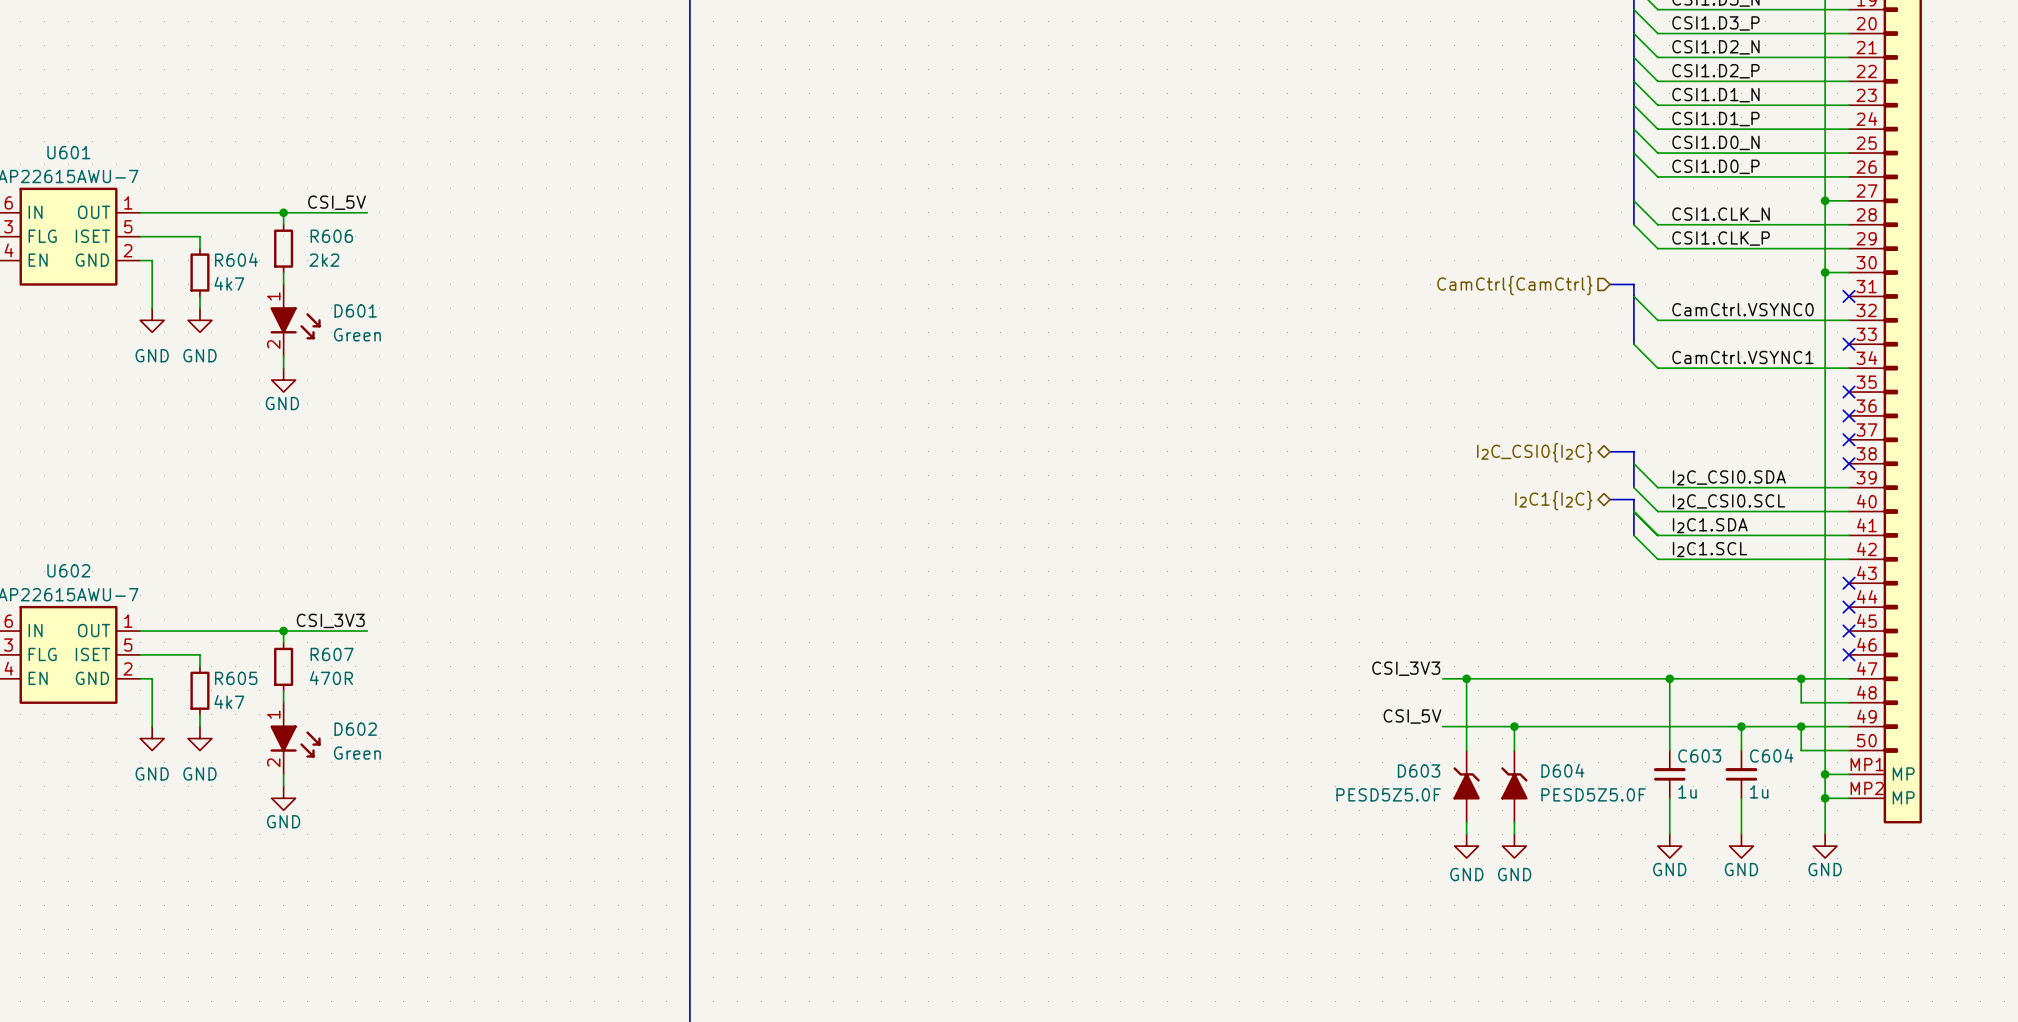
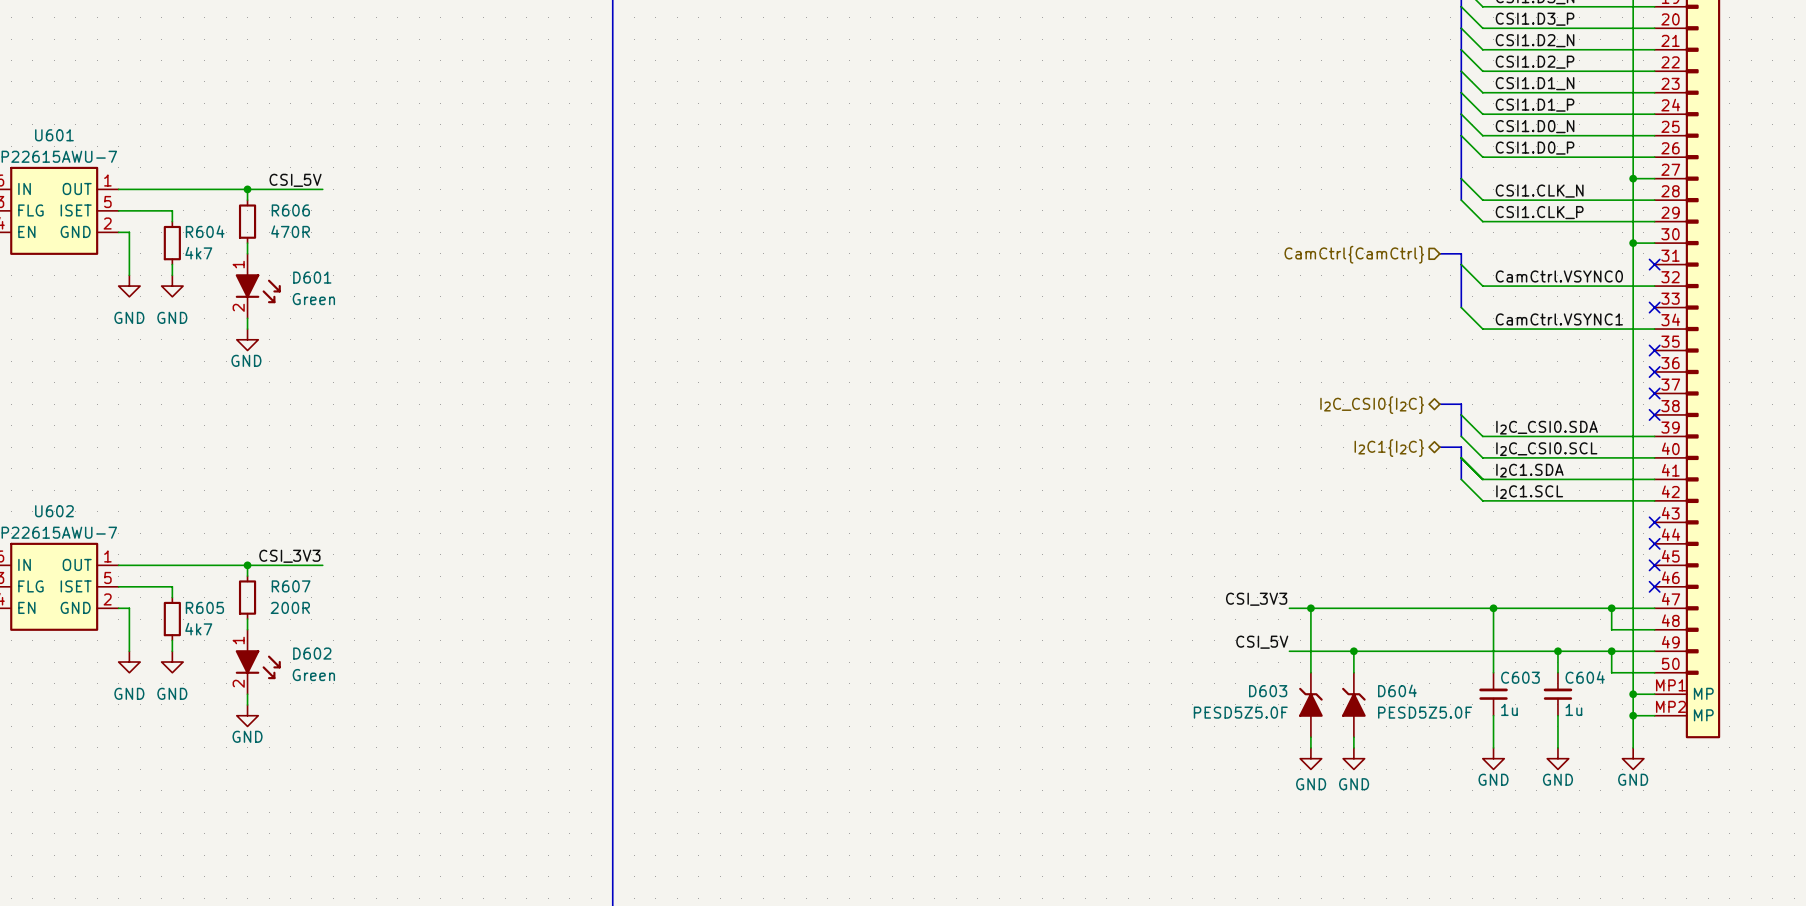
R606 text: 2k2 (324, 260) -> 470R (290, 231)
R607 text: 470R (331, 678) -> 200R (290, 607)

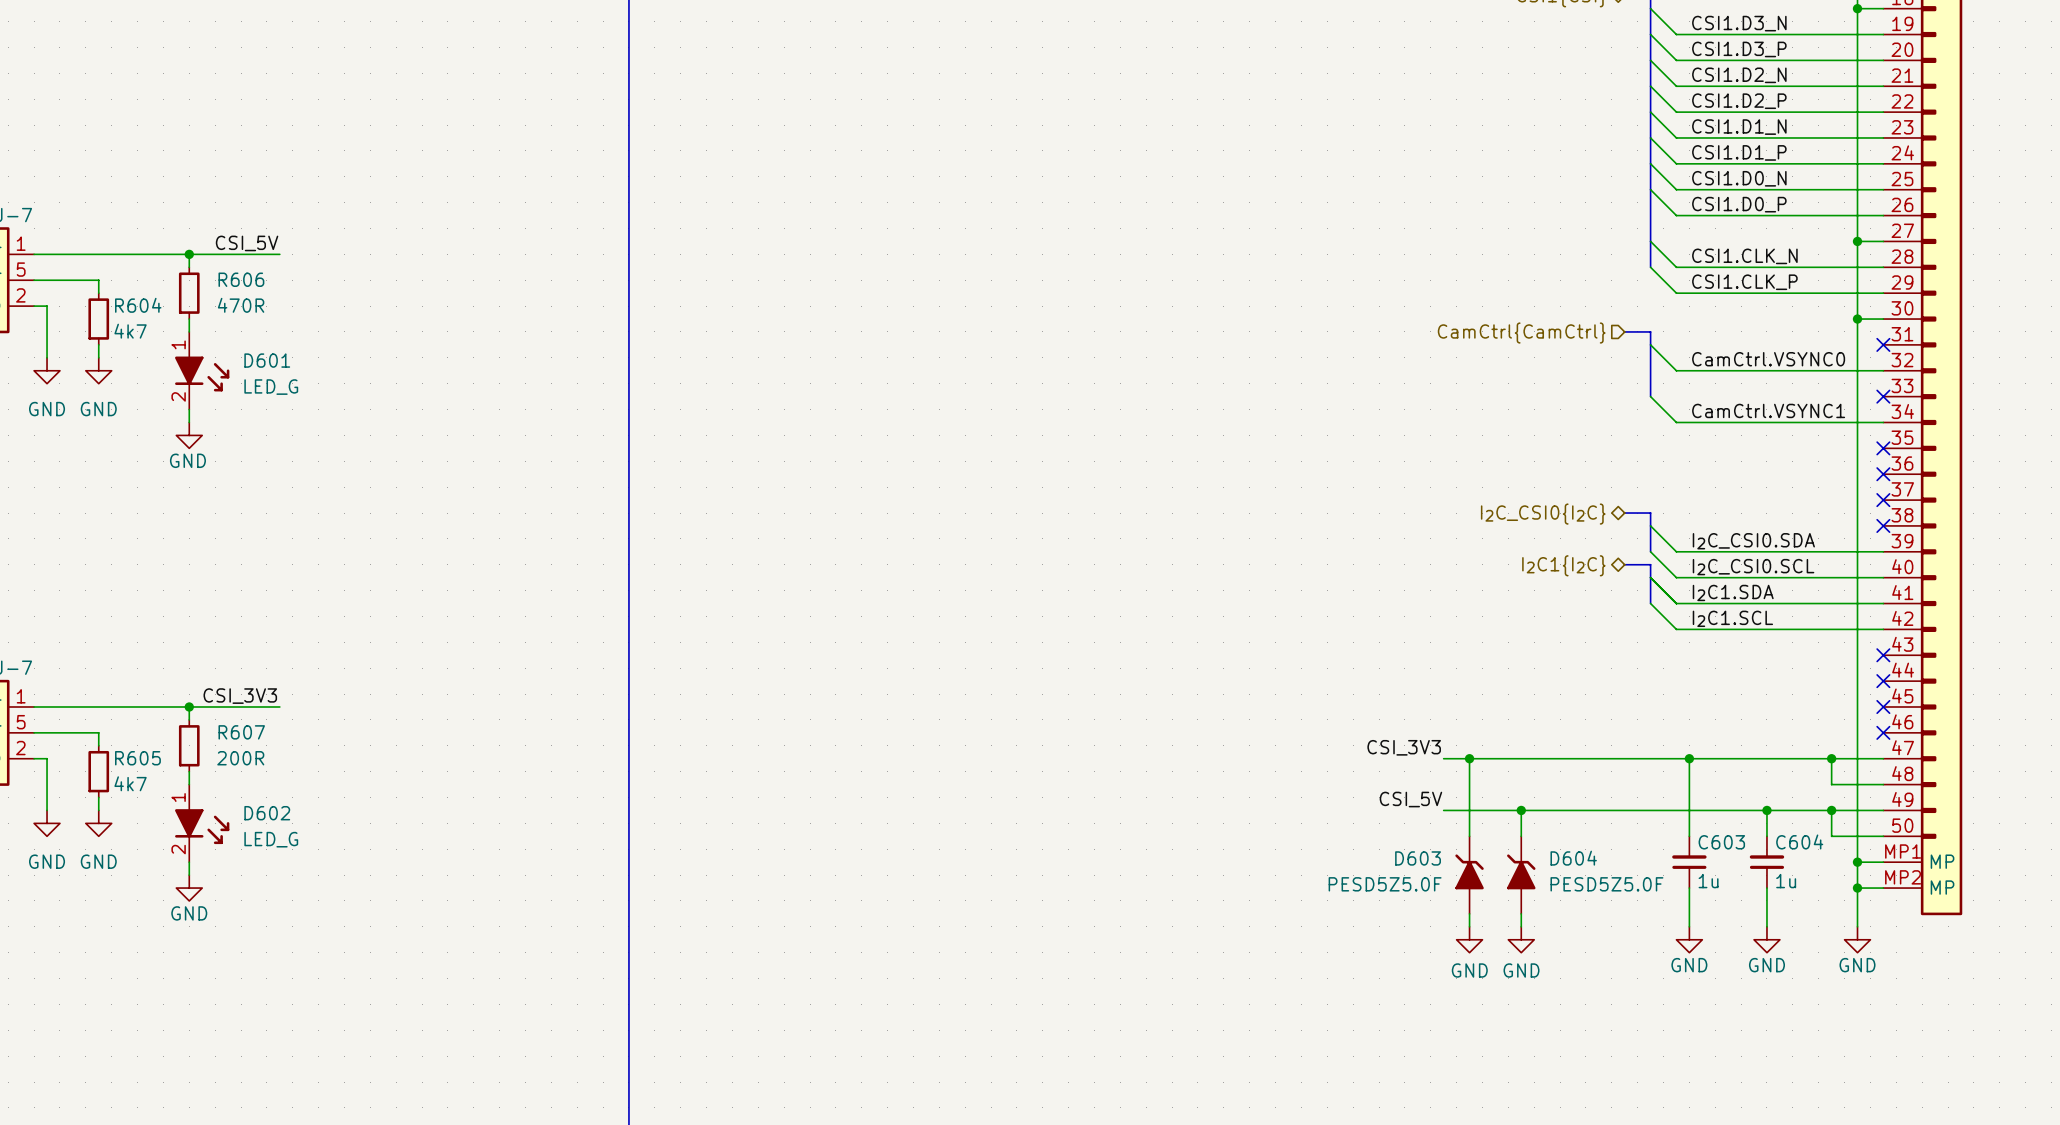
D601 text: Green (313, 299) -> none
D601 value: none -> LED_G (271, 387)
D602 text: Green (313, 675) -> none
D602 value: none -> LED_G (271, 839)

